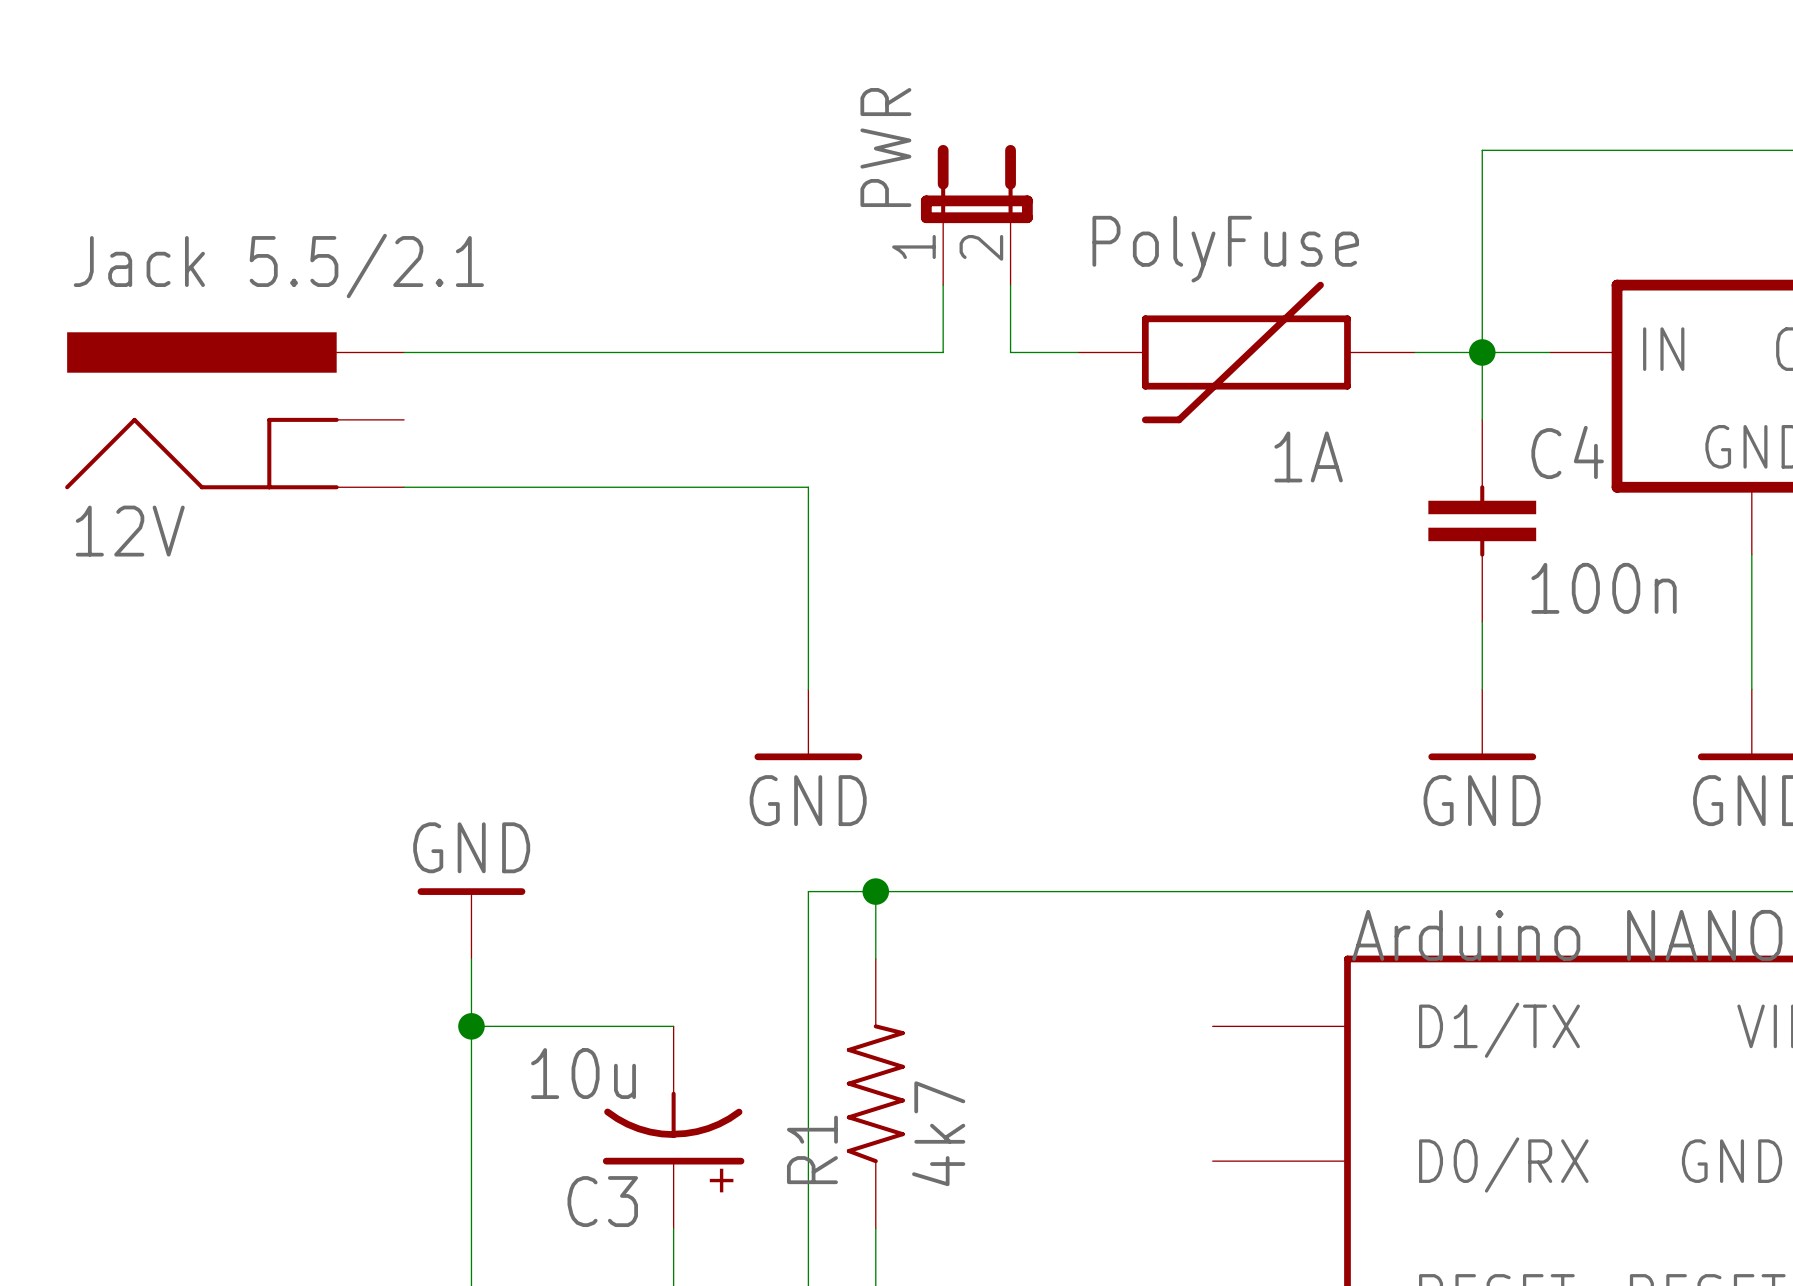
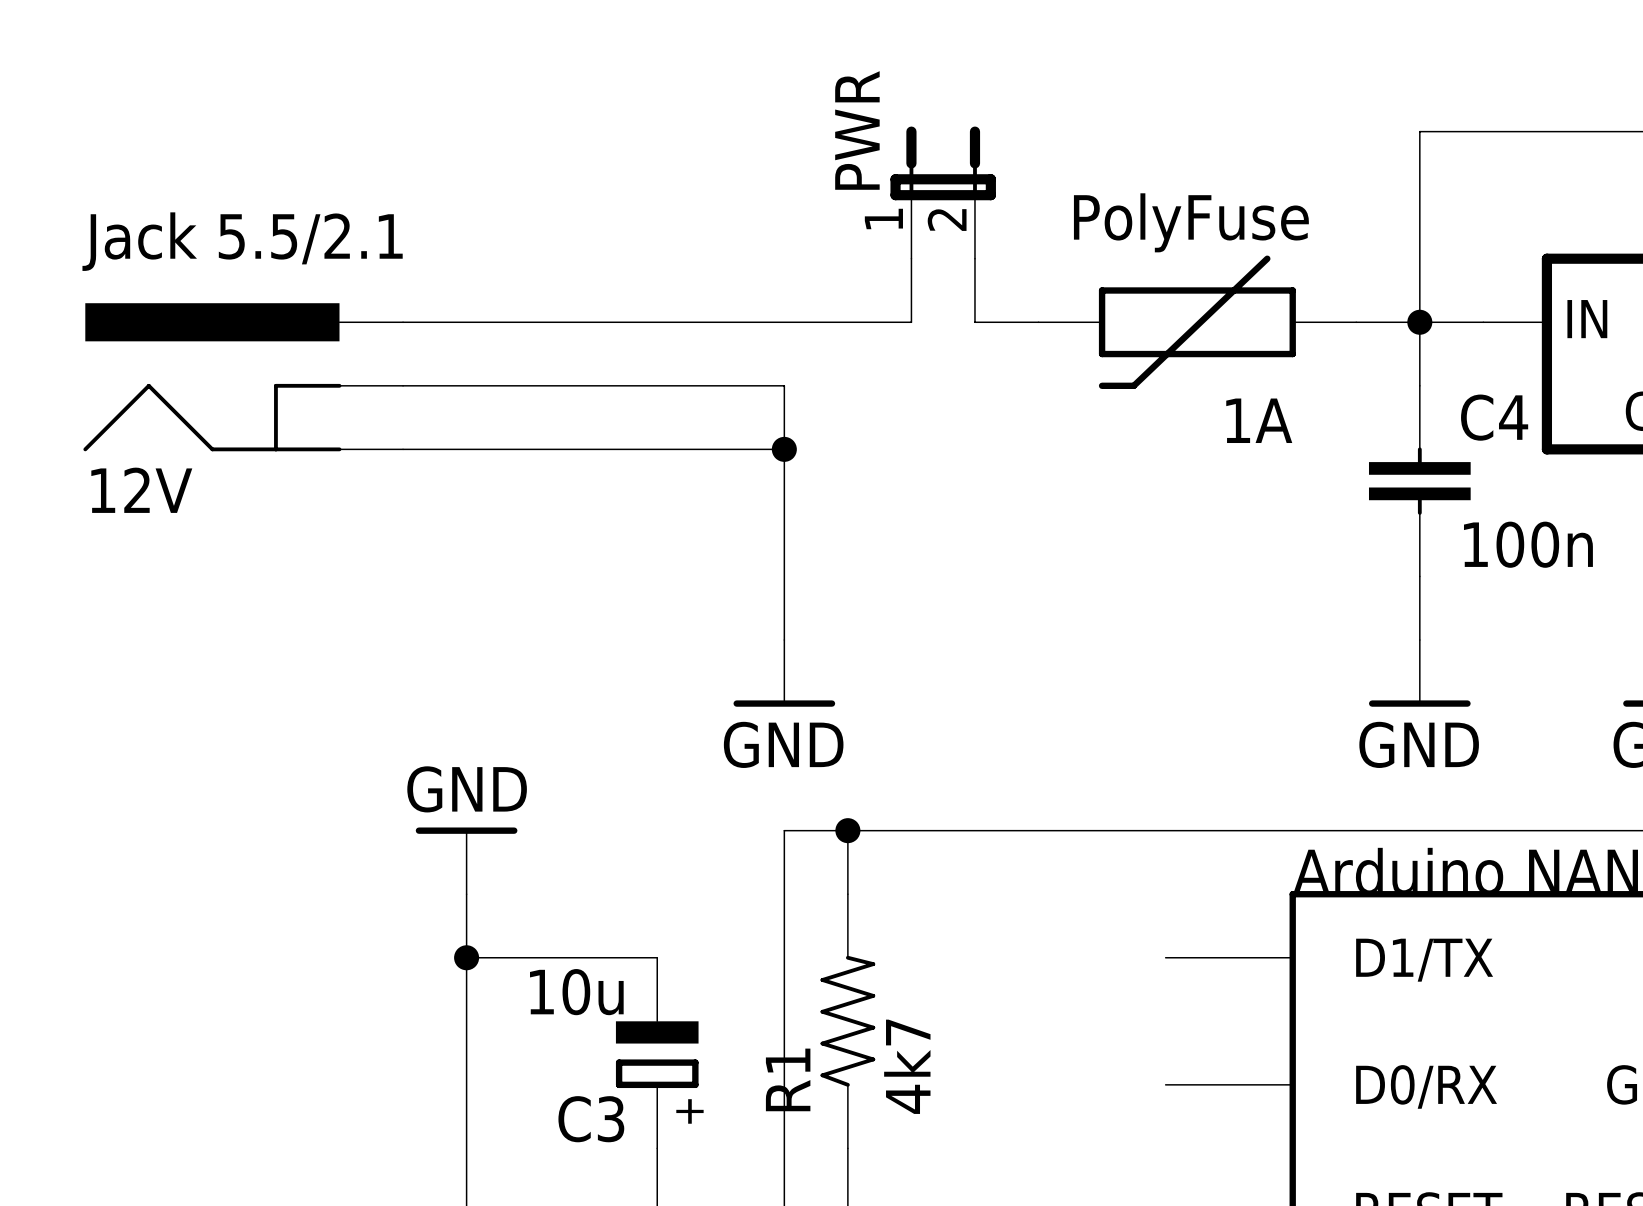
wire: none -> (403, 385) (784, 385) (784, 449)
junction: none -> (784, 449)
C3 symbol: [602, 1026, 745, 1229] -> [615, 957, 699, 1149]

